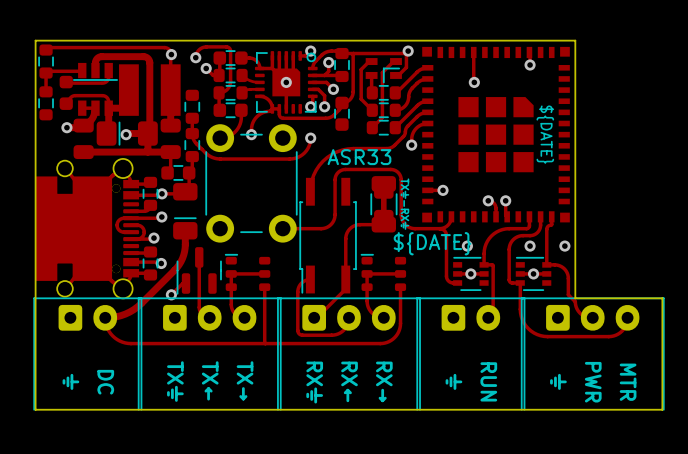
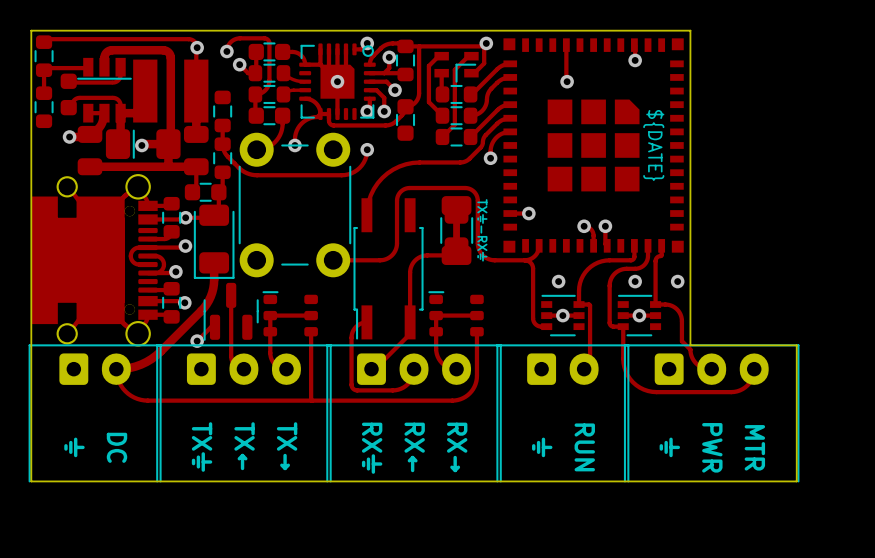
text: ASR33 (359, 157) -> none
part footprint: [173, 183, 198, 240] -> [193, 204, 235, 279]
text: ${DATE} (432, 243) -> none

